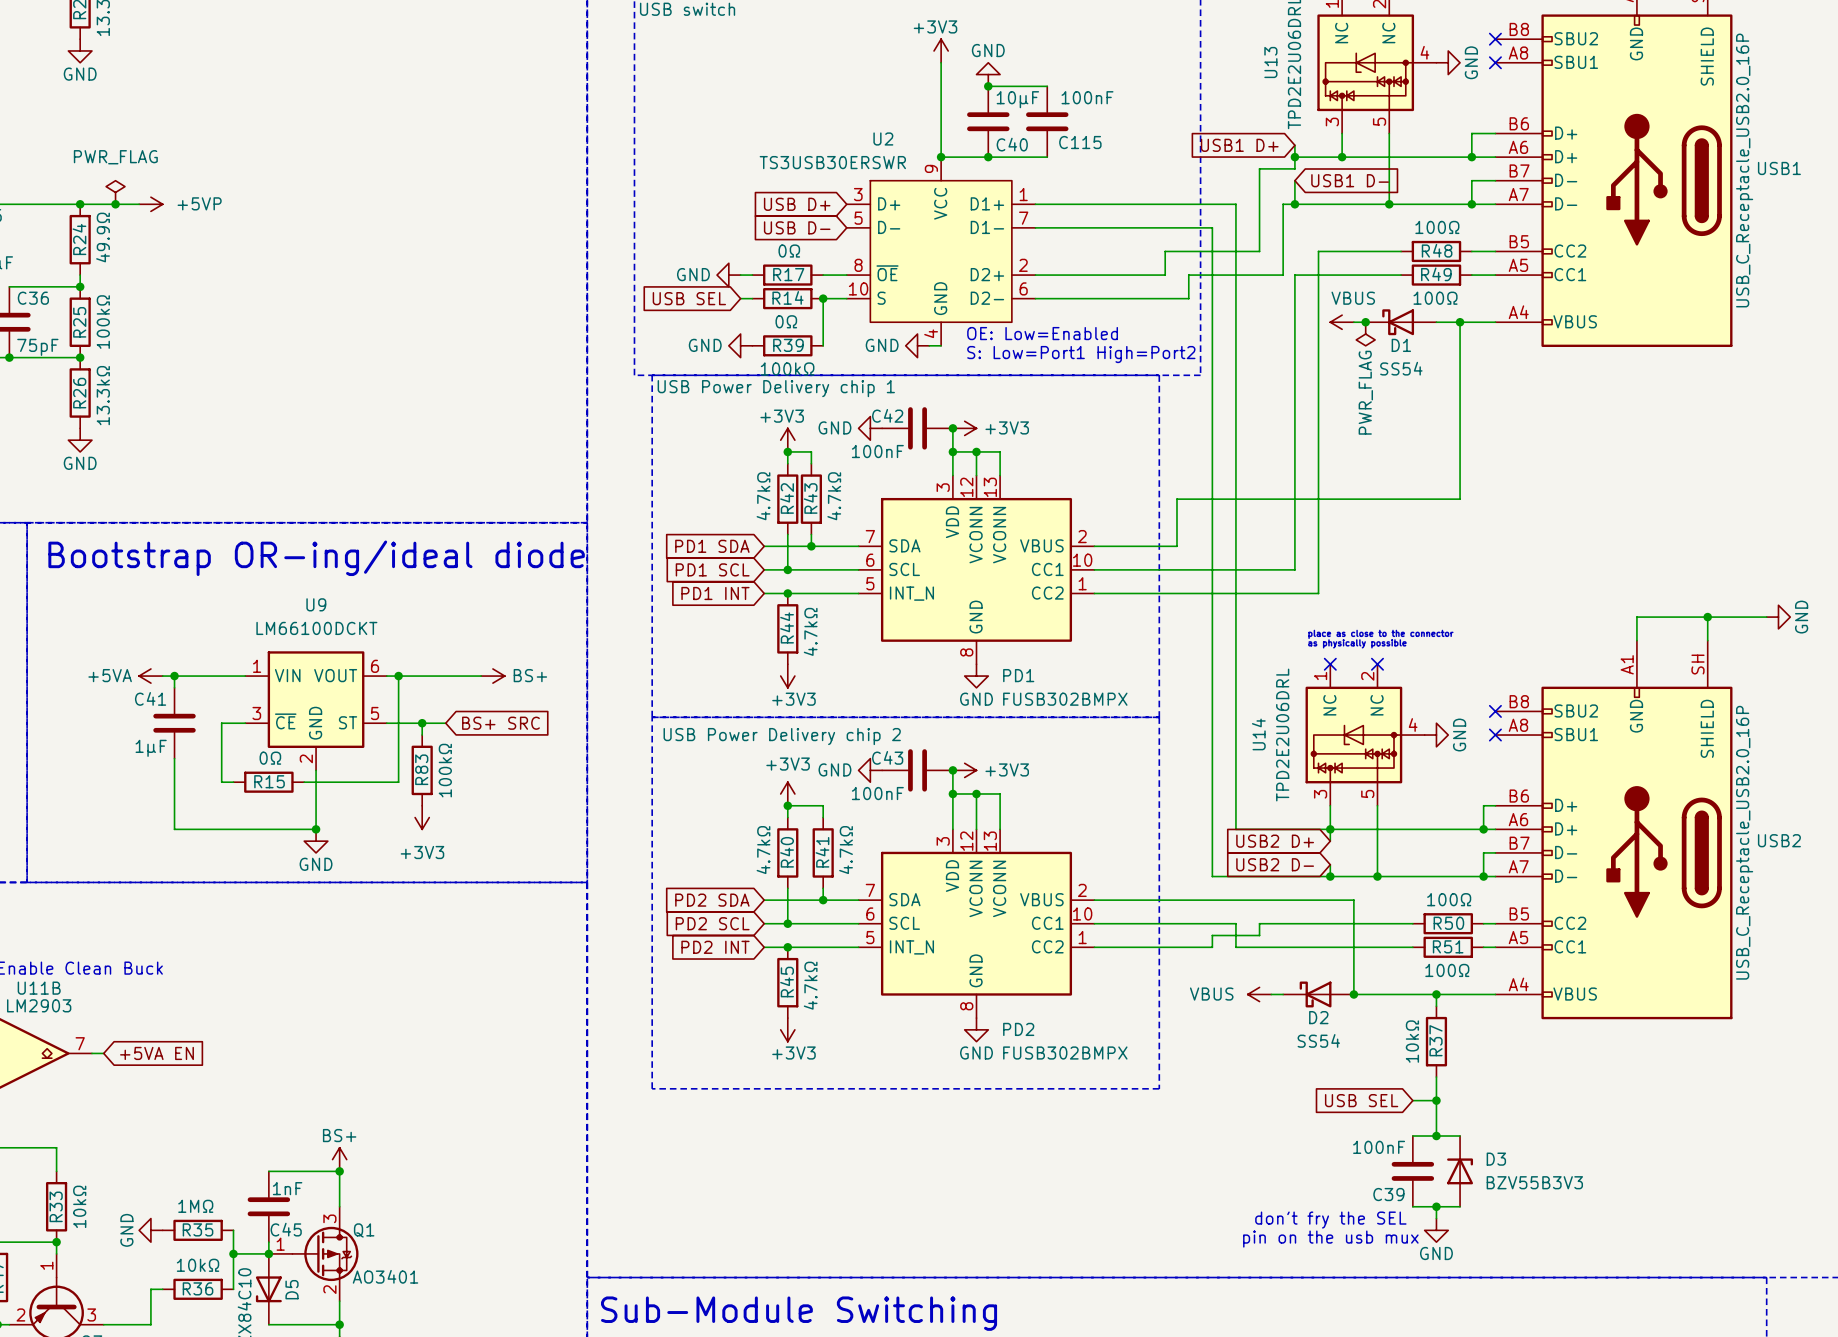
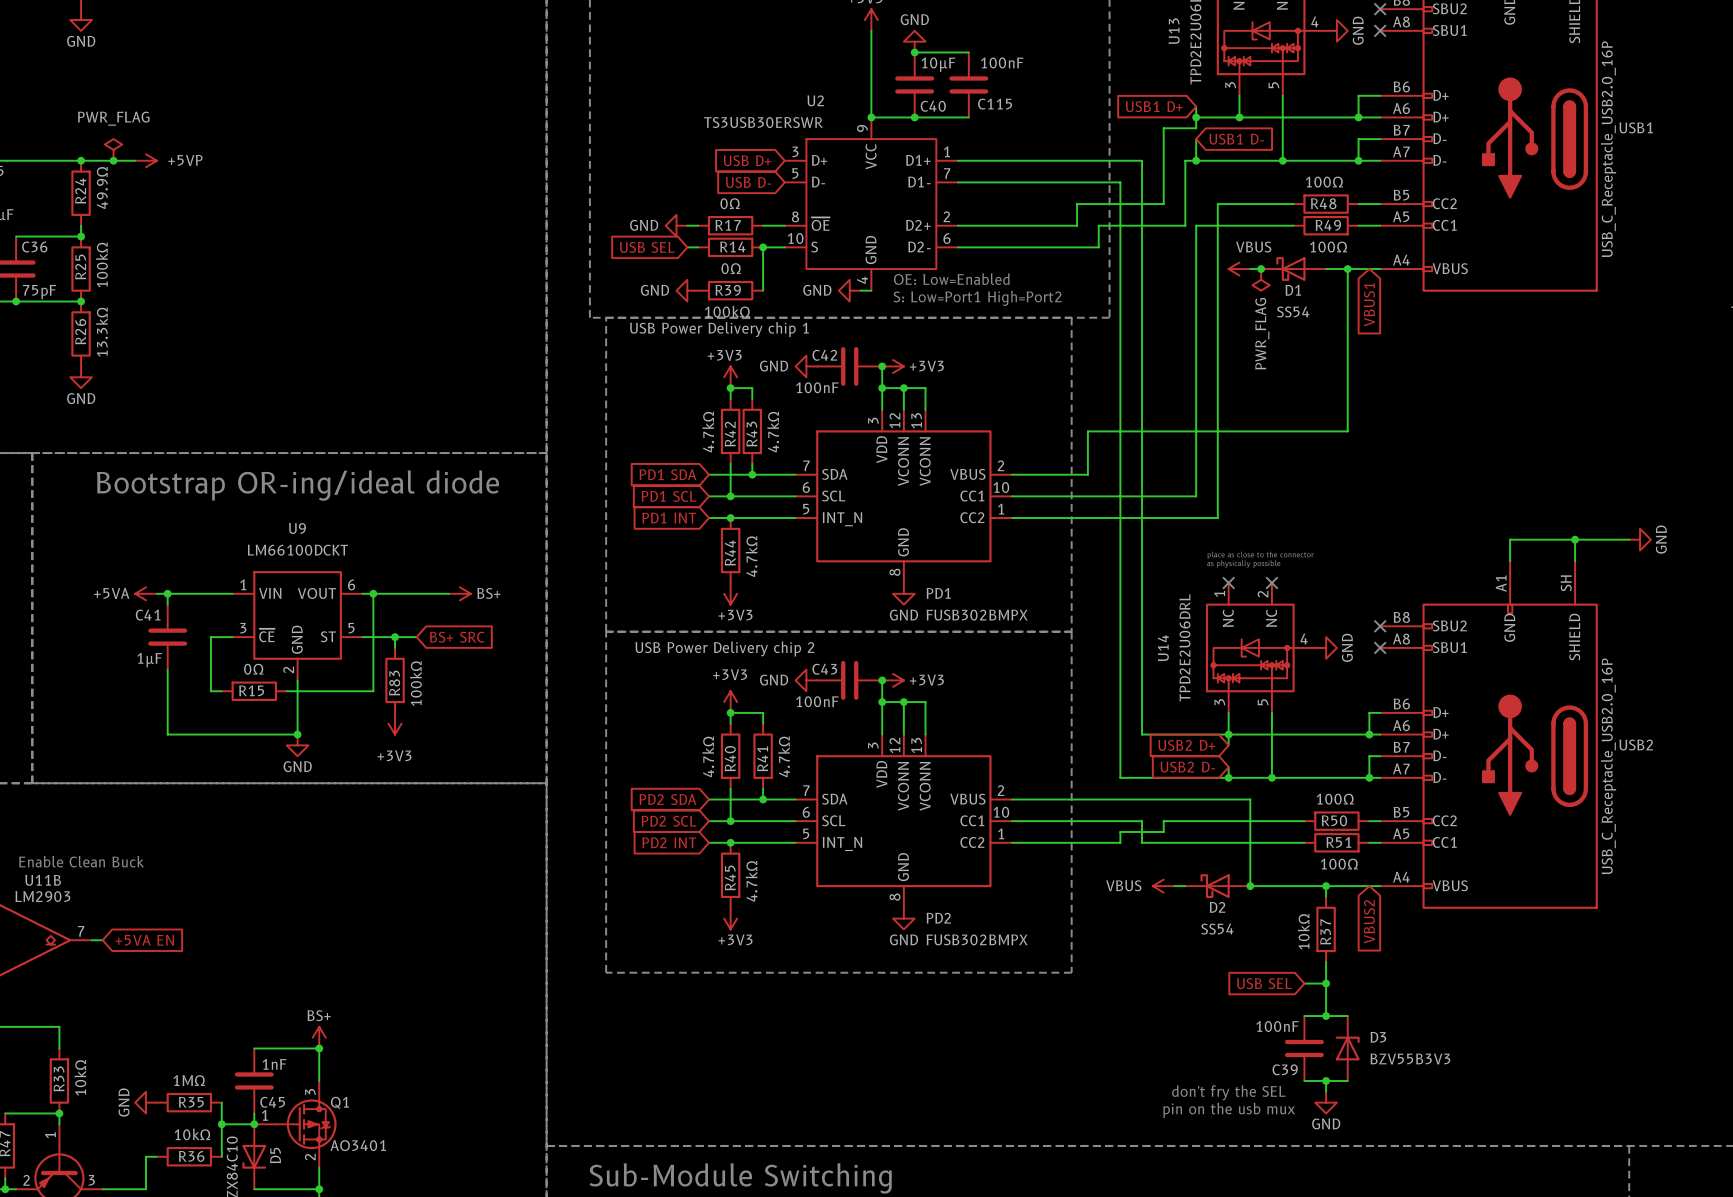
global label: none -> VBUS1 (1369, 304)
global label: none -> VBUS2 (1369, 921)

